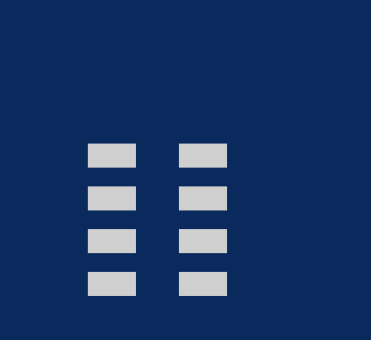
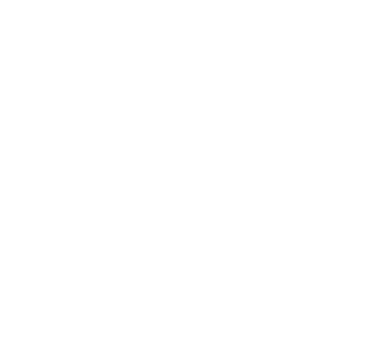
part: (157, 219) -> none

